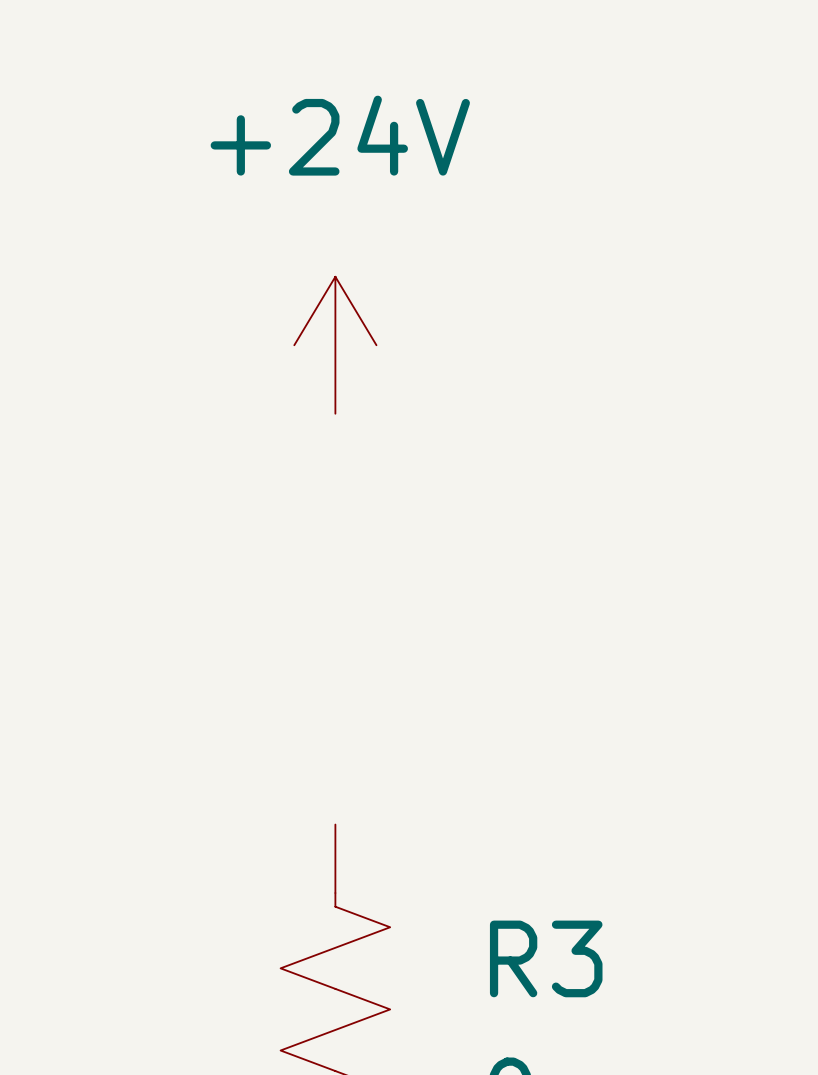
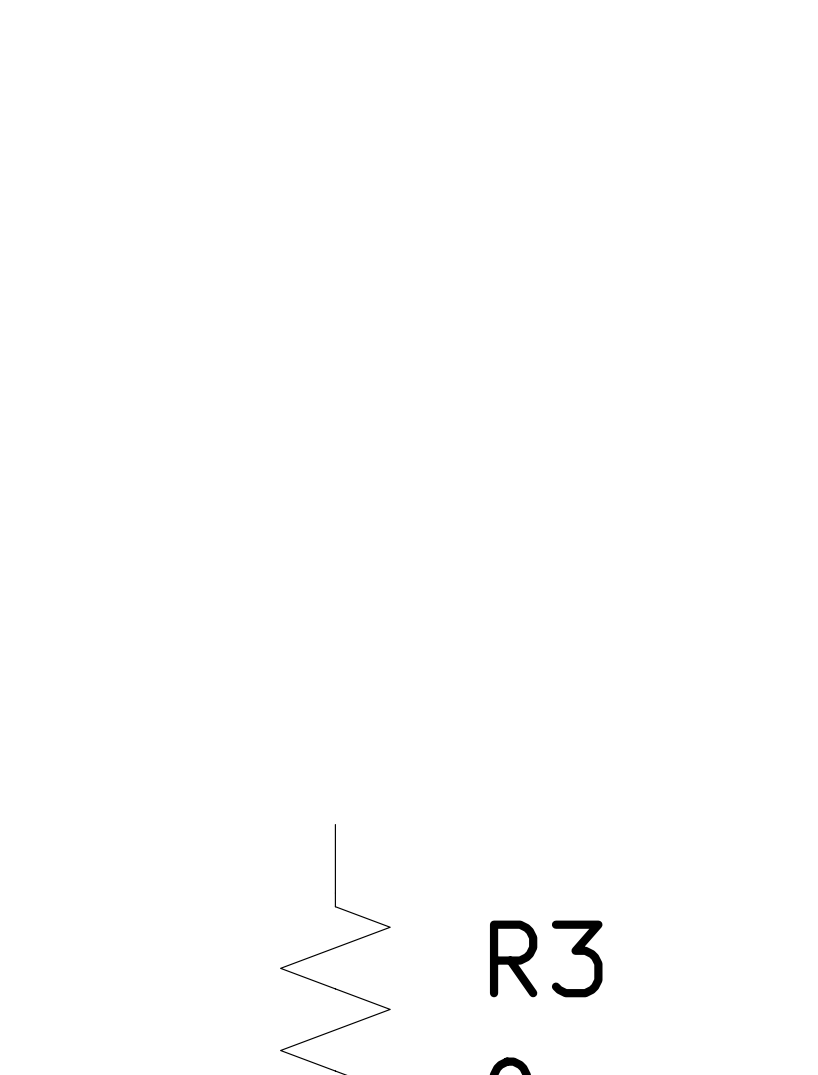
power symbol: +24V (335, 345) -> none

